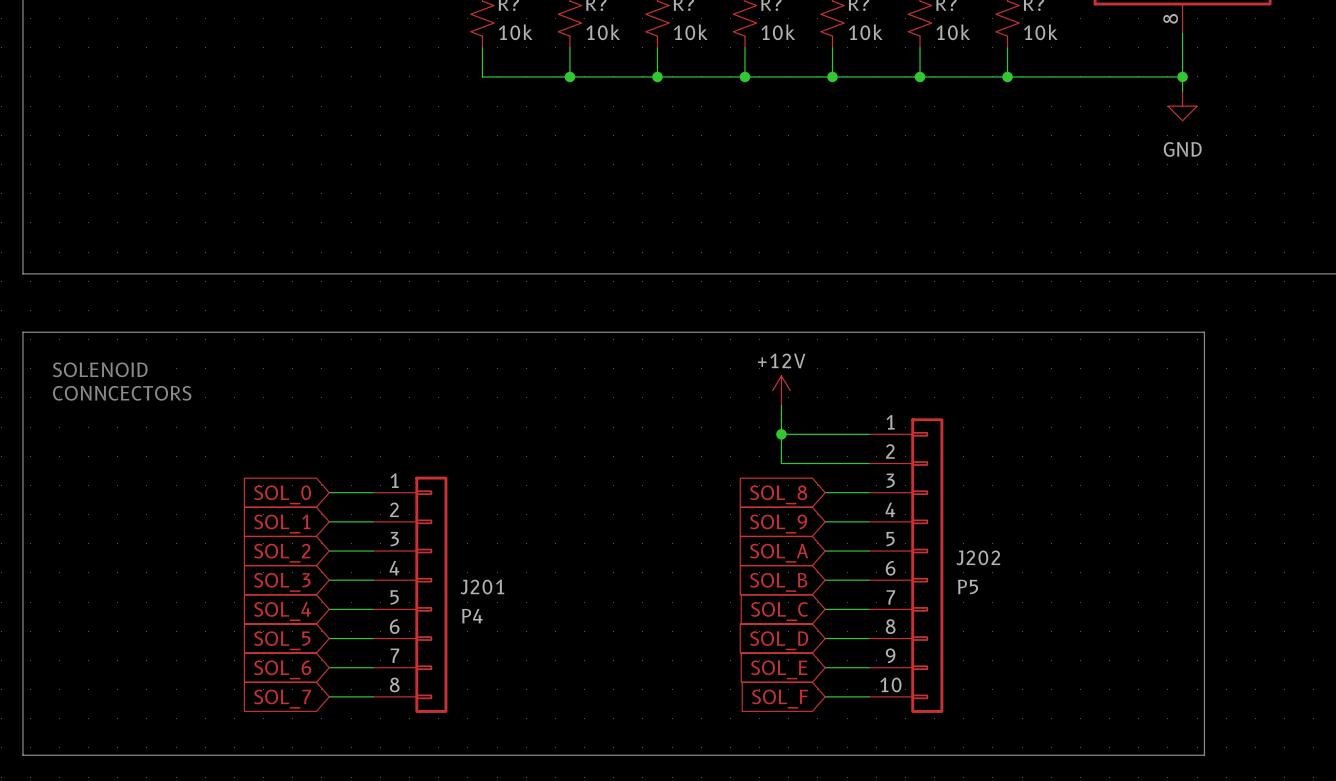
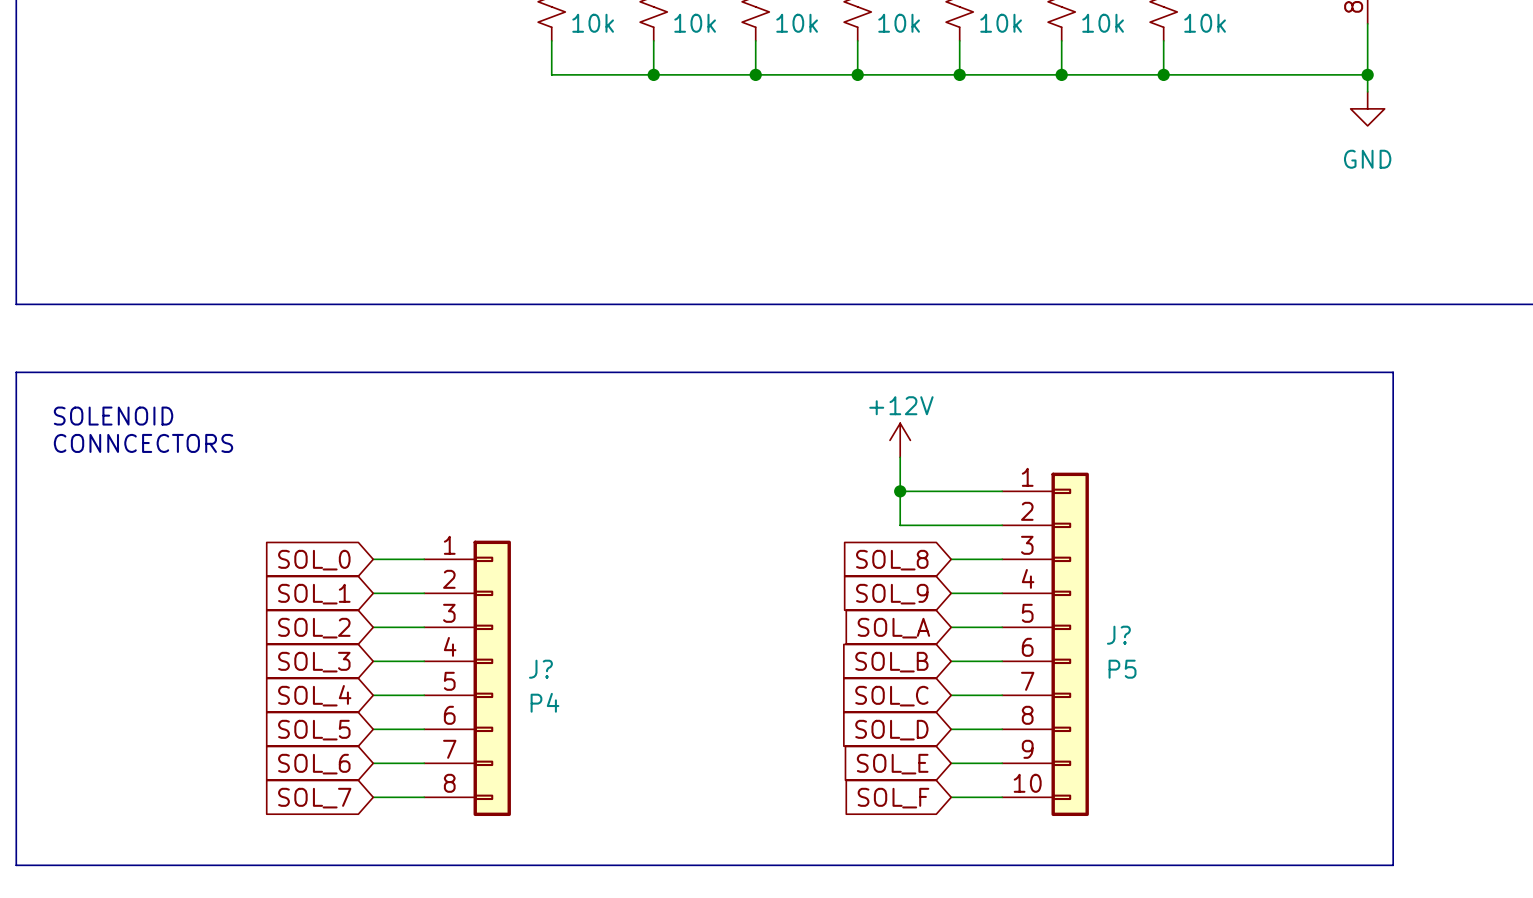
J202 name: J202 (978, 557) -> J? (1118, 635)
J201 name: J201 (482, 587) -> J? (540, 669)

